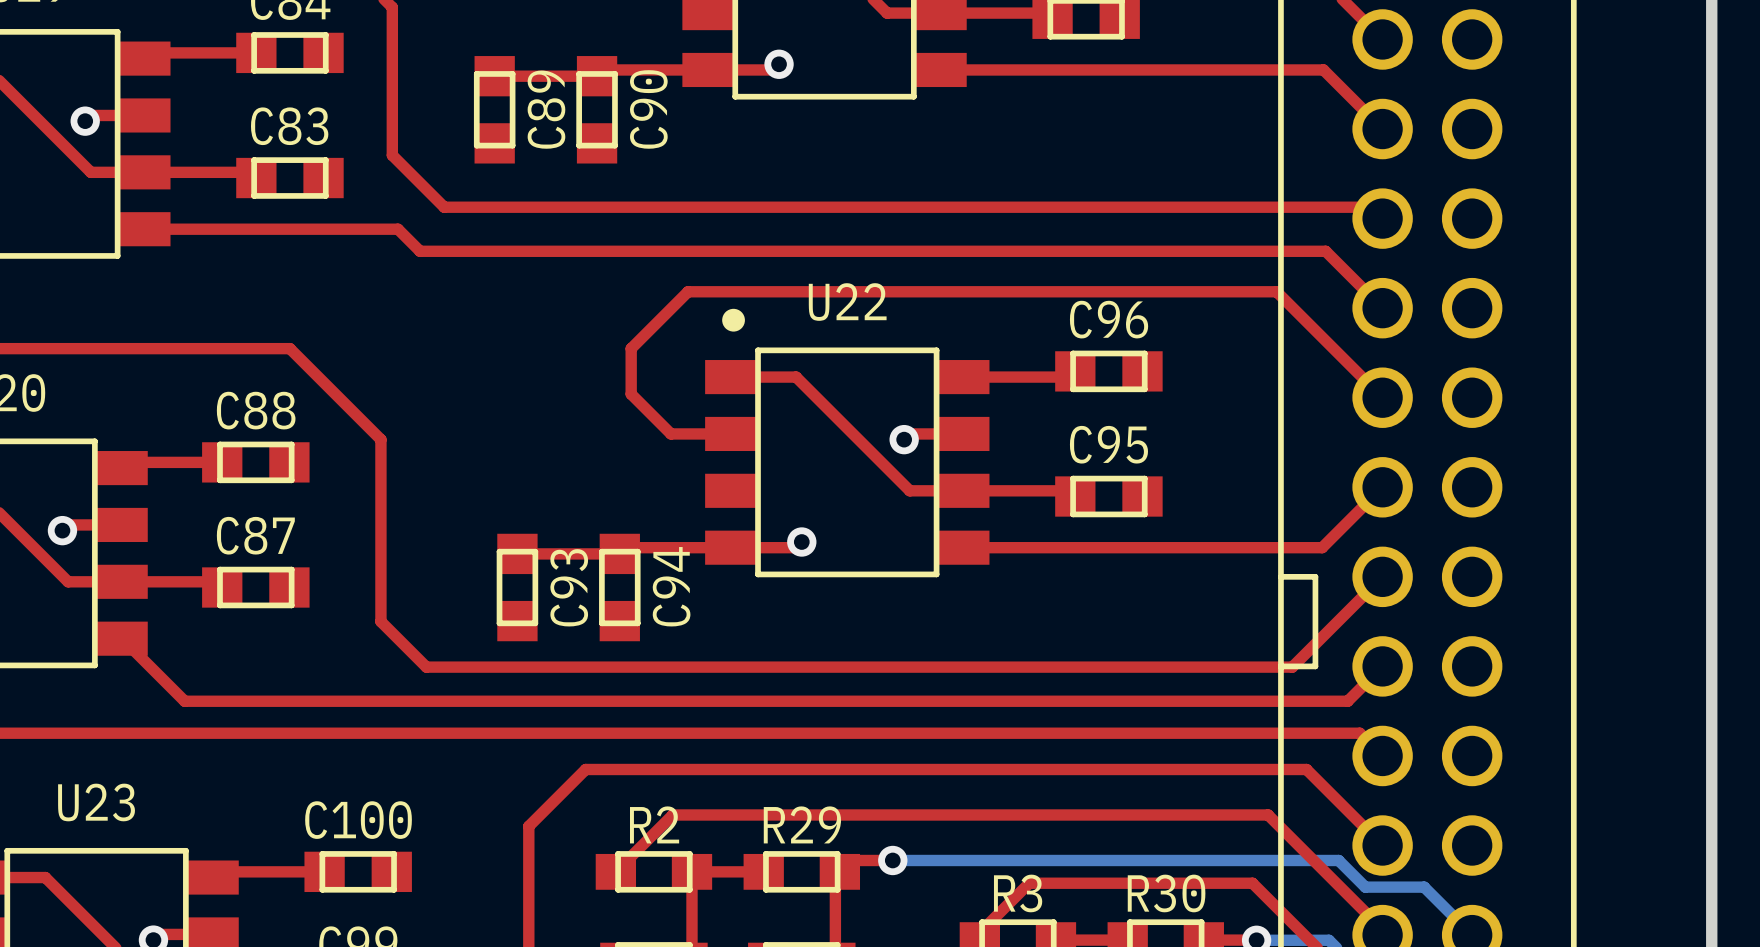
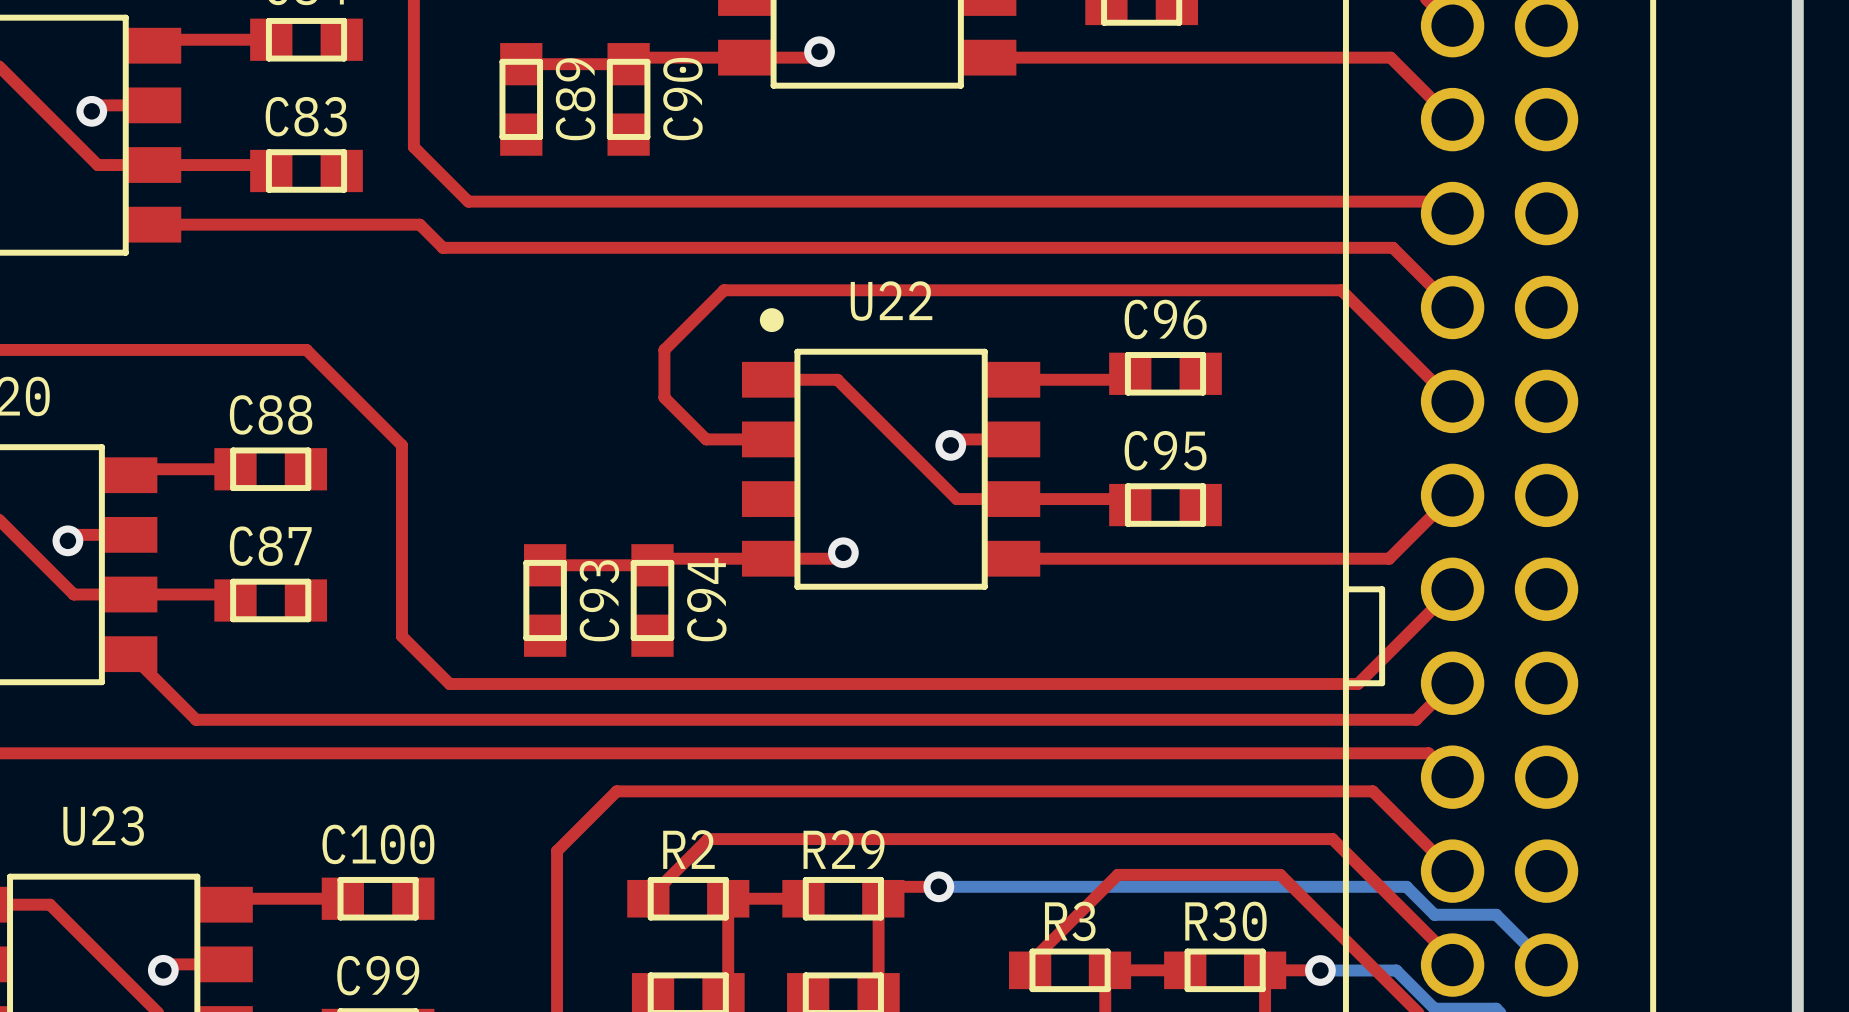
top track: (1029, 883) (1252, 883) -> (1081, 910) (1117, 874) (1280, 874) (1316, 910)

